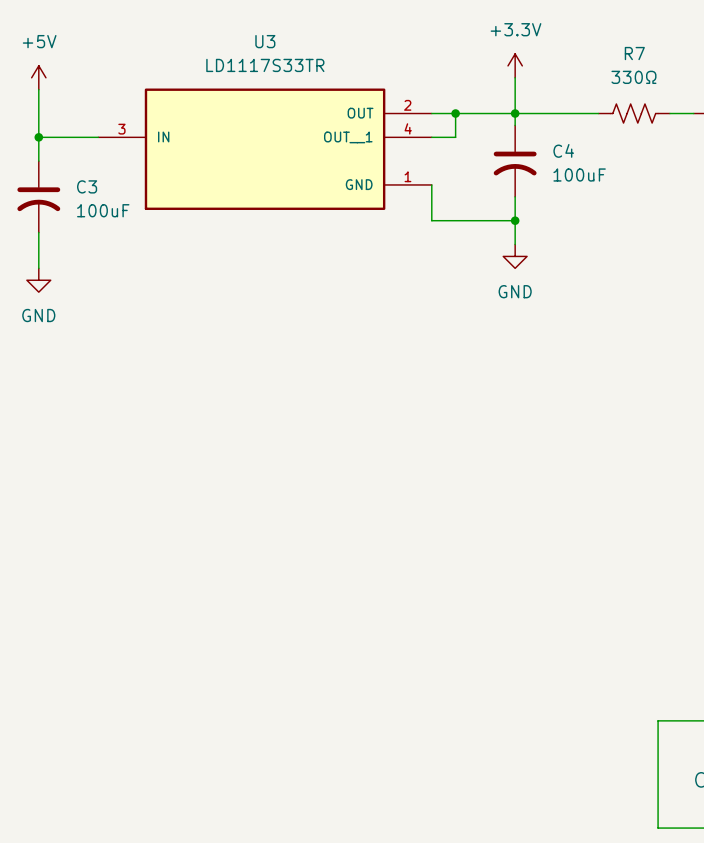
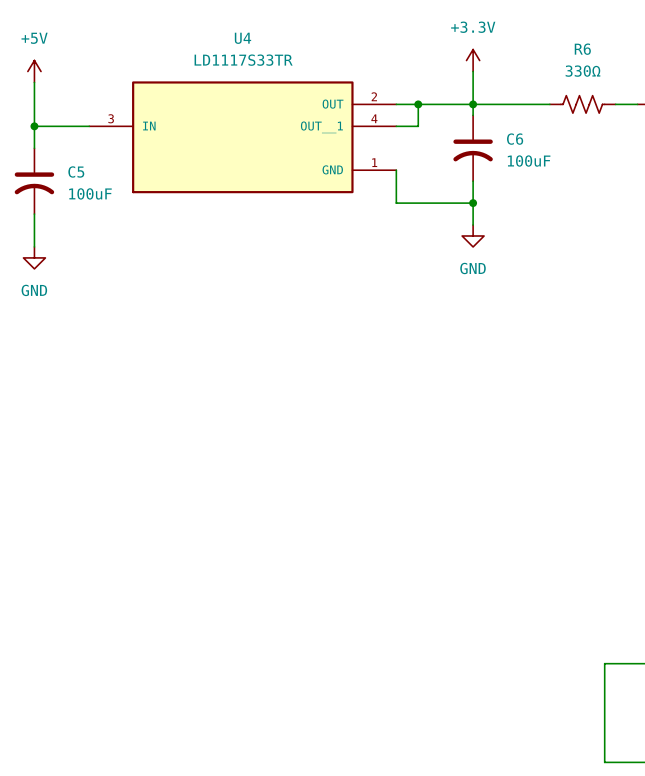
U3 name: U3 (265, 41) -> U4 (242, 38)
R7 name: R7 (634, 53) -> R6 (582, 49)
C4 name: C4 (563, 150) -> C6 (515, 139)
C3 name: C3 (87, 186) -> C5 (76, 171)

